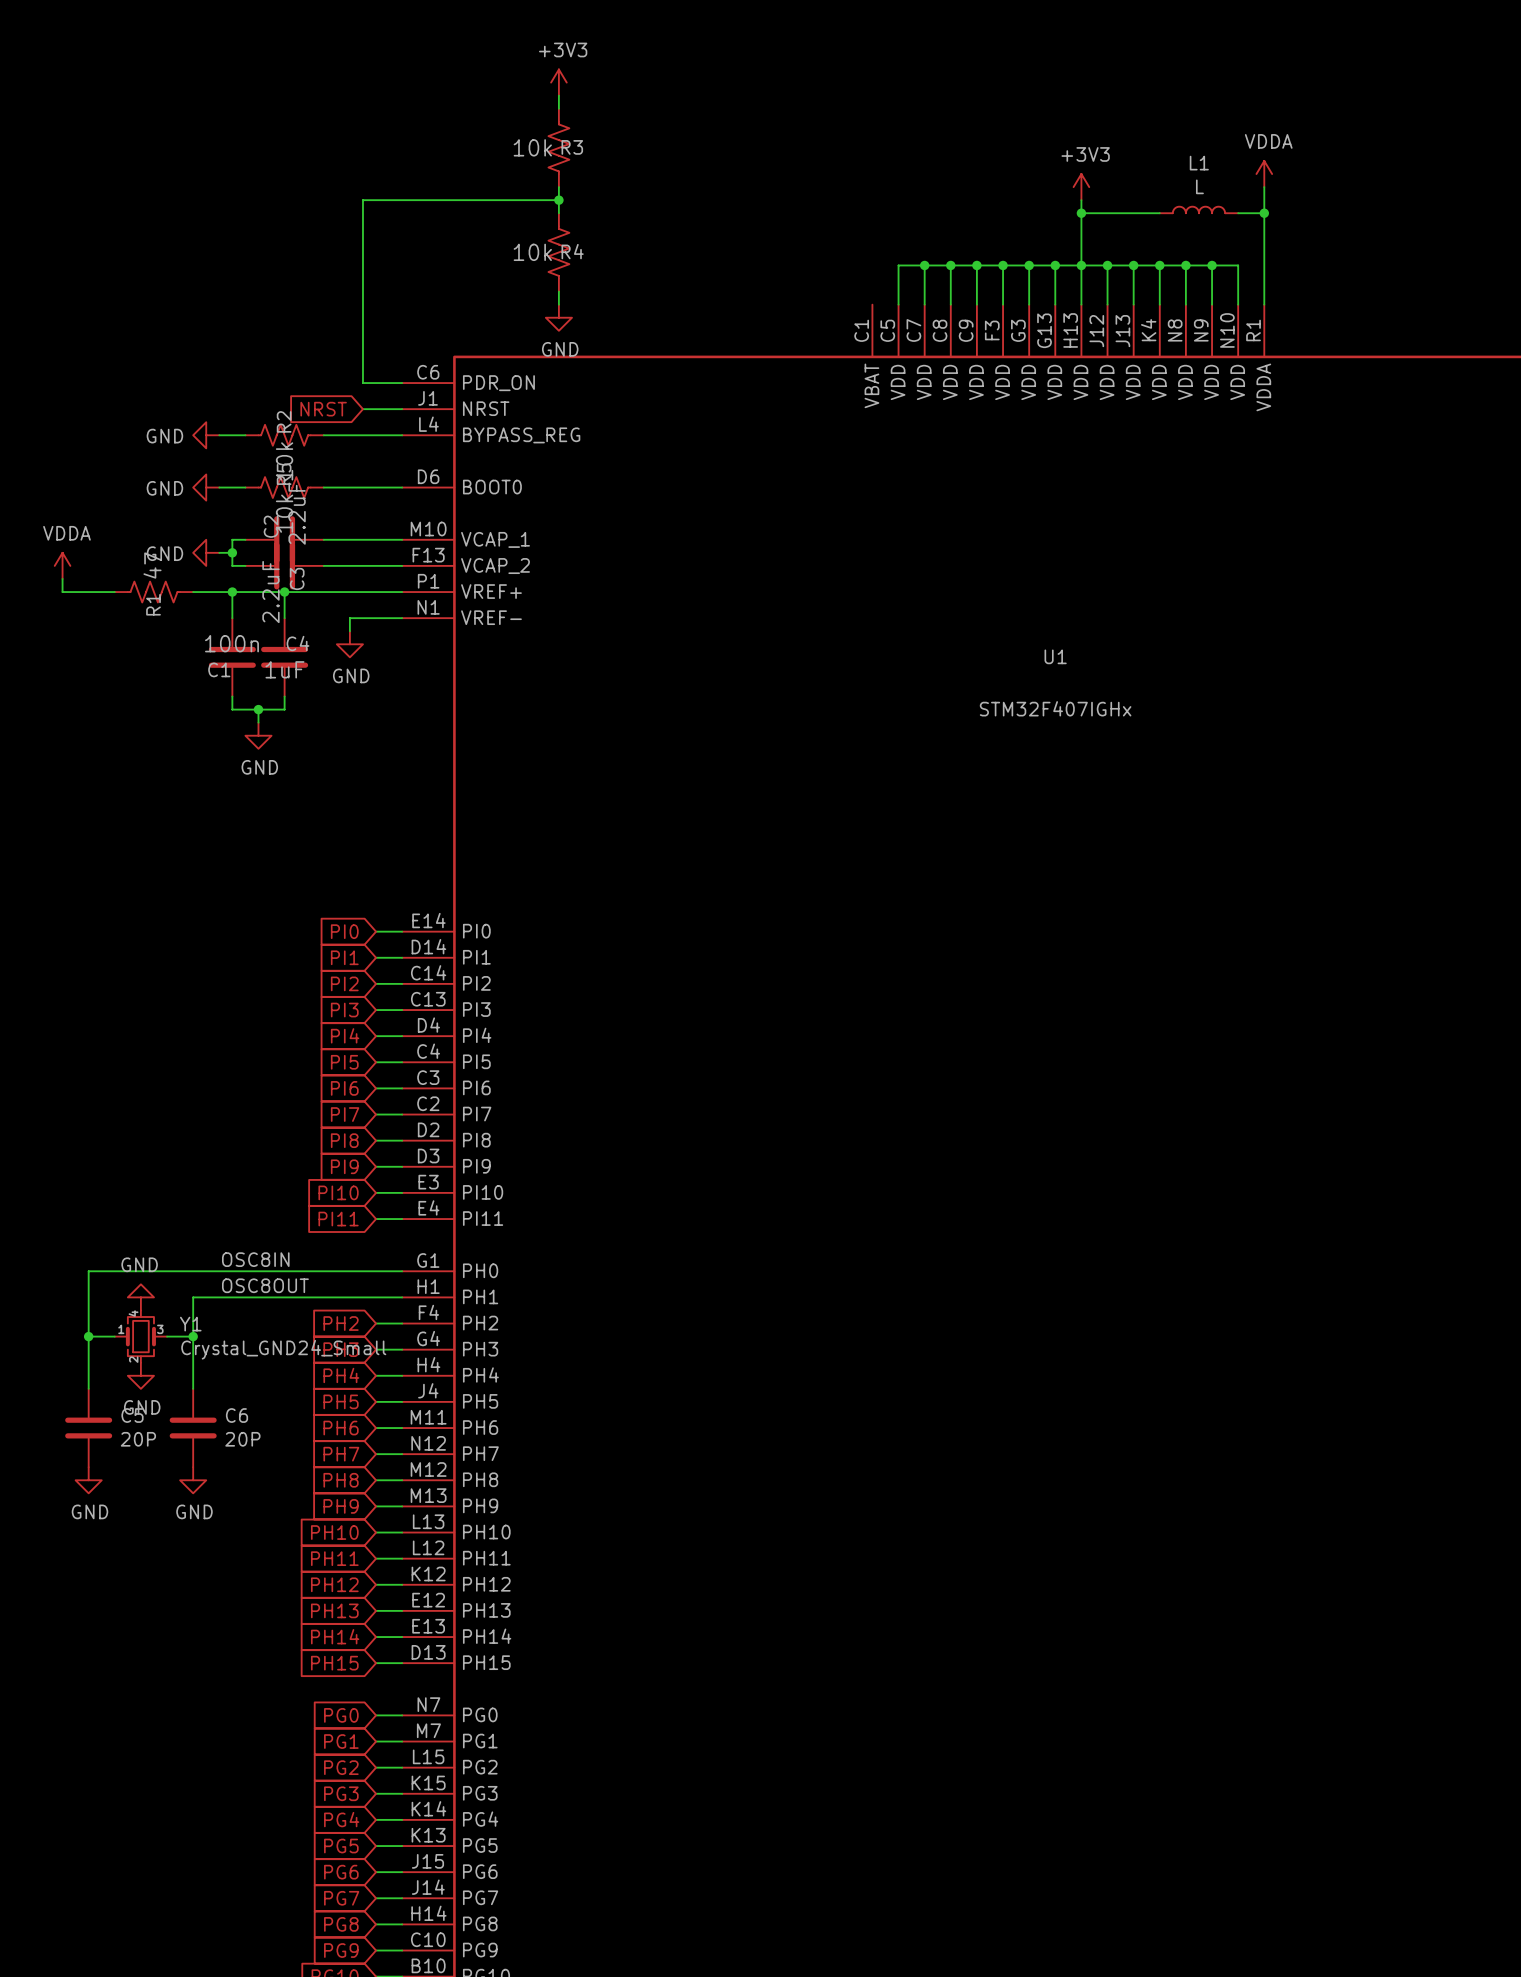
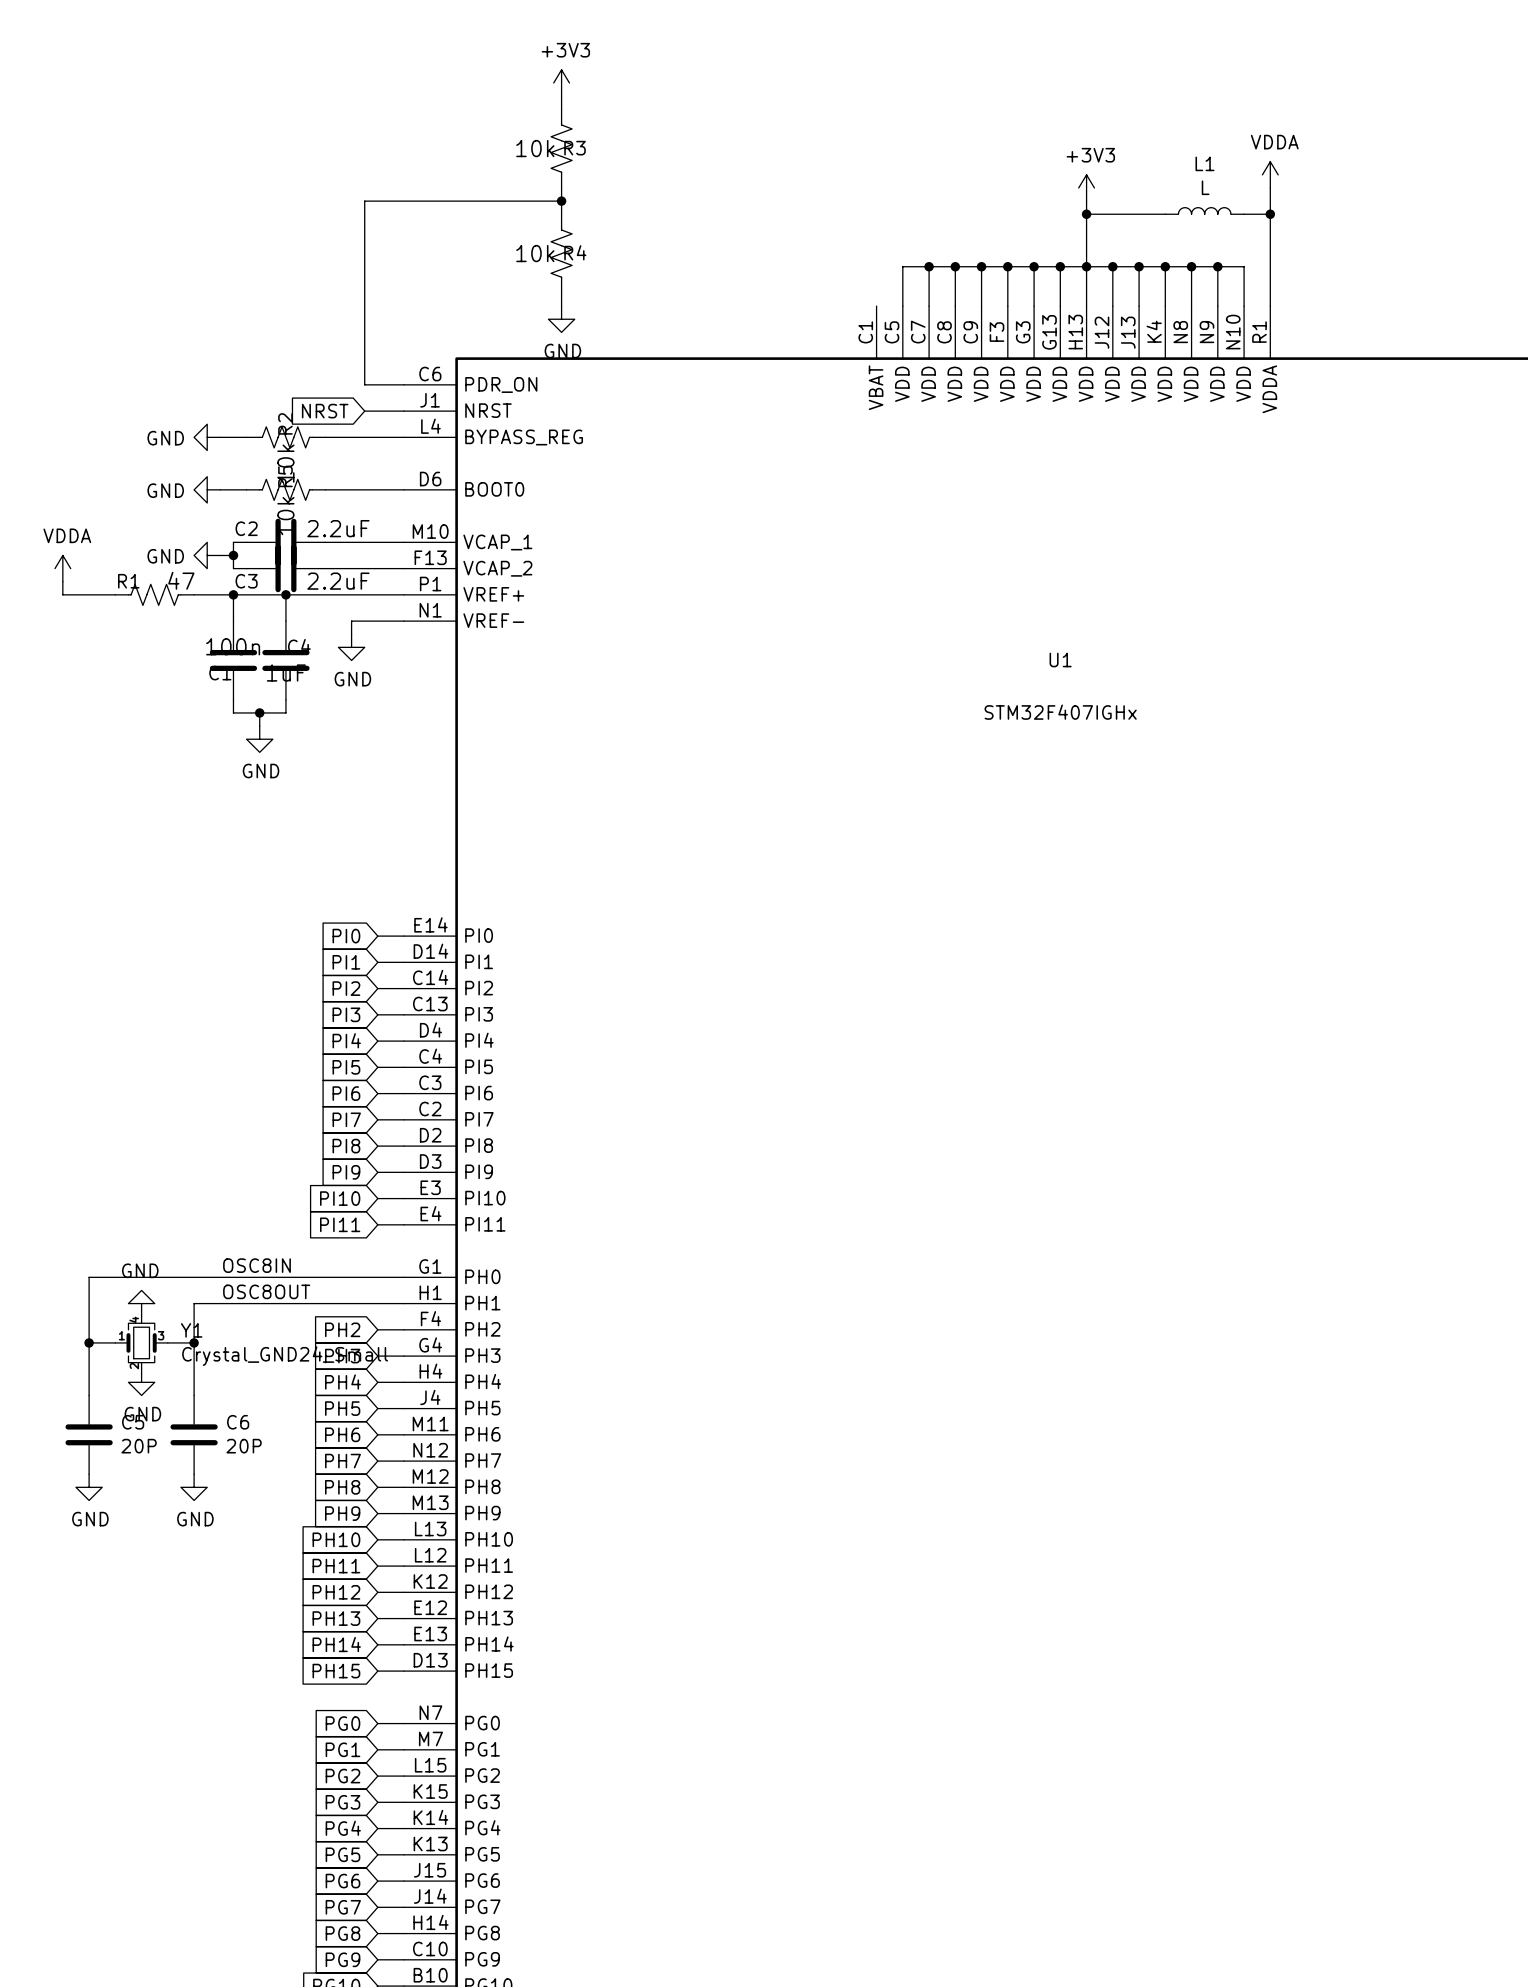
C3 value rotation: 0° (297, 513) -> 90° clockwise (338, 528)
C2 name rotation: 0° (271, 526) -> 90° clockwise (246, 528)
R1 value rotation: 0° (152, 565) -> 90° clockwise (181, 580)
C3 name rotation: 0° (297, 578) -> 90° clockwise (246, 581)
C3 name position: C3 (297, 578) -> C3 (246, 581)
C2 value rotation: 0° (270, 592) -> 90° clockwise (338, 581)
R1 name rotation: 0° (153, 604) -> 90° clockwise (128, 581)
R1 name position: R1 (153, 604) -> R1 (128, 581)

